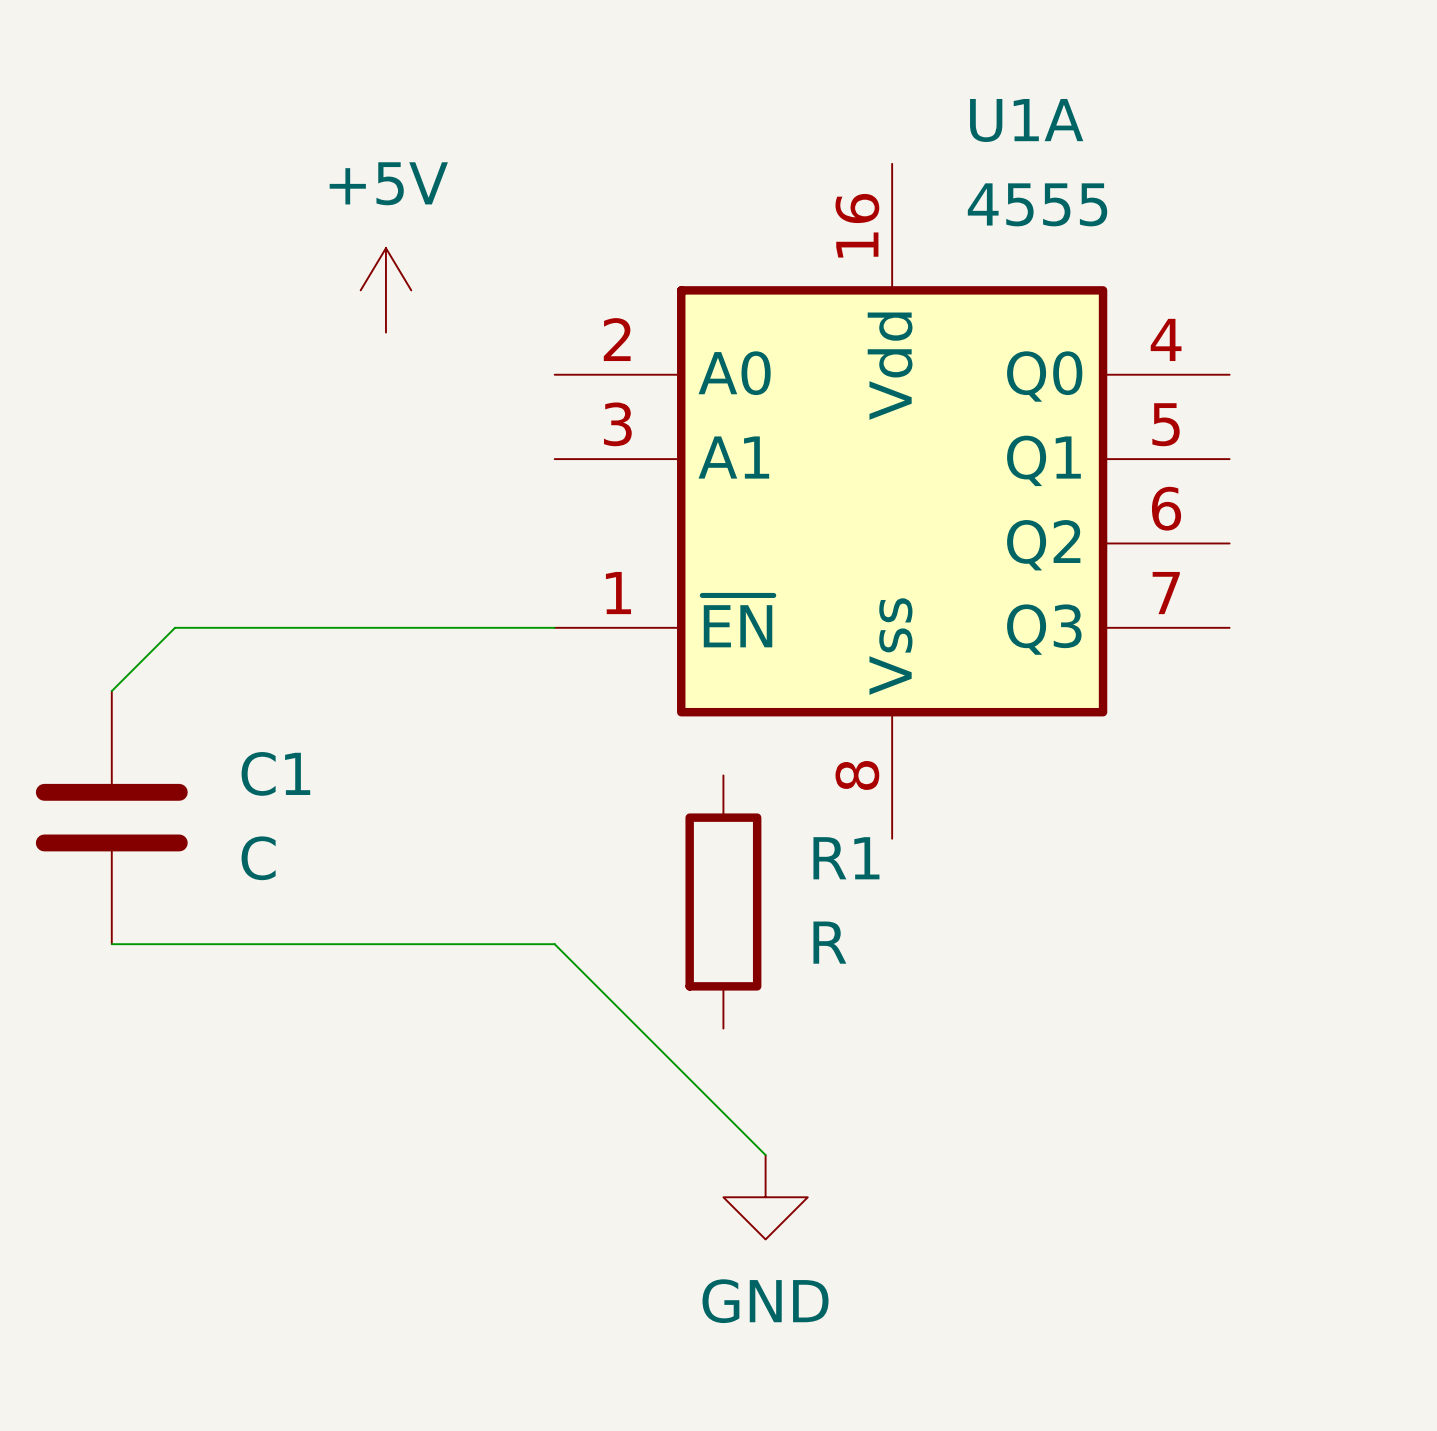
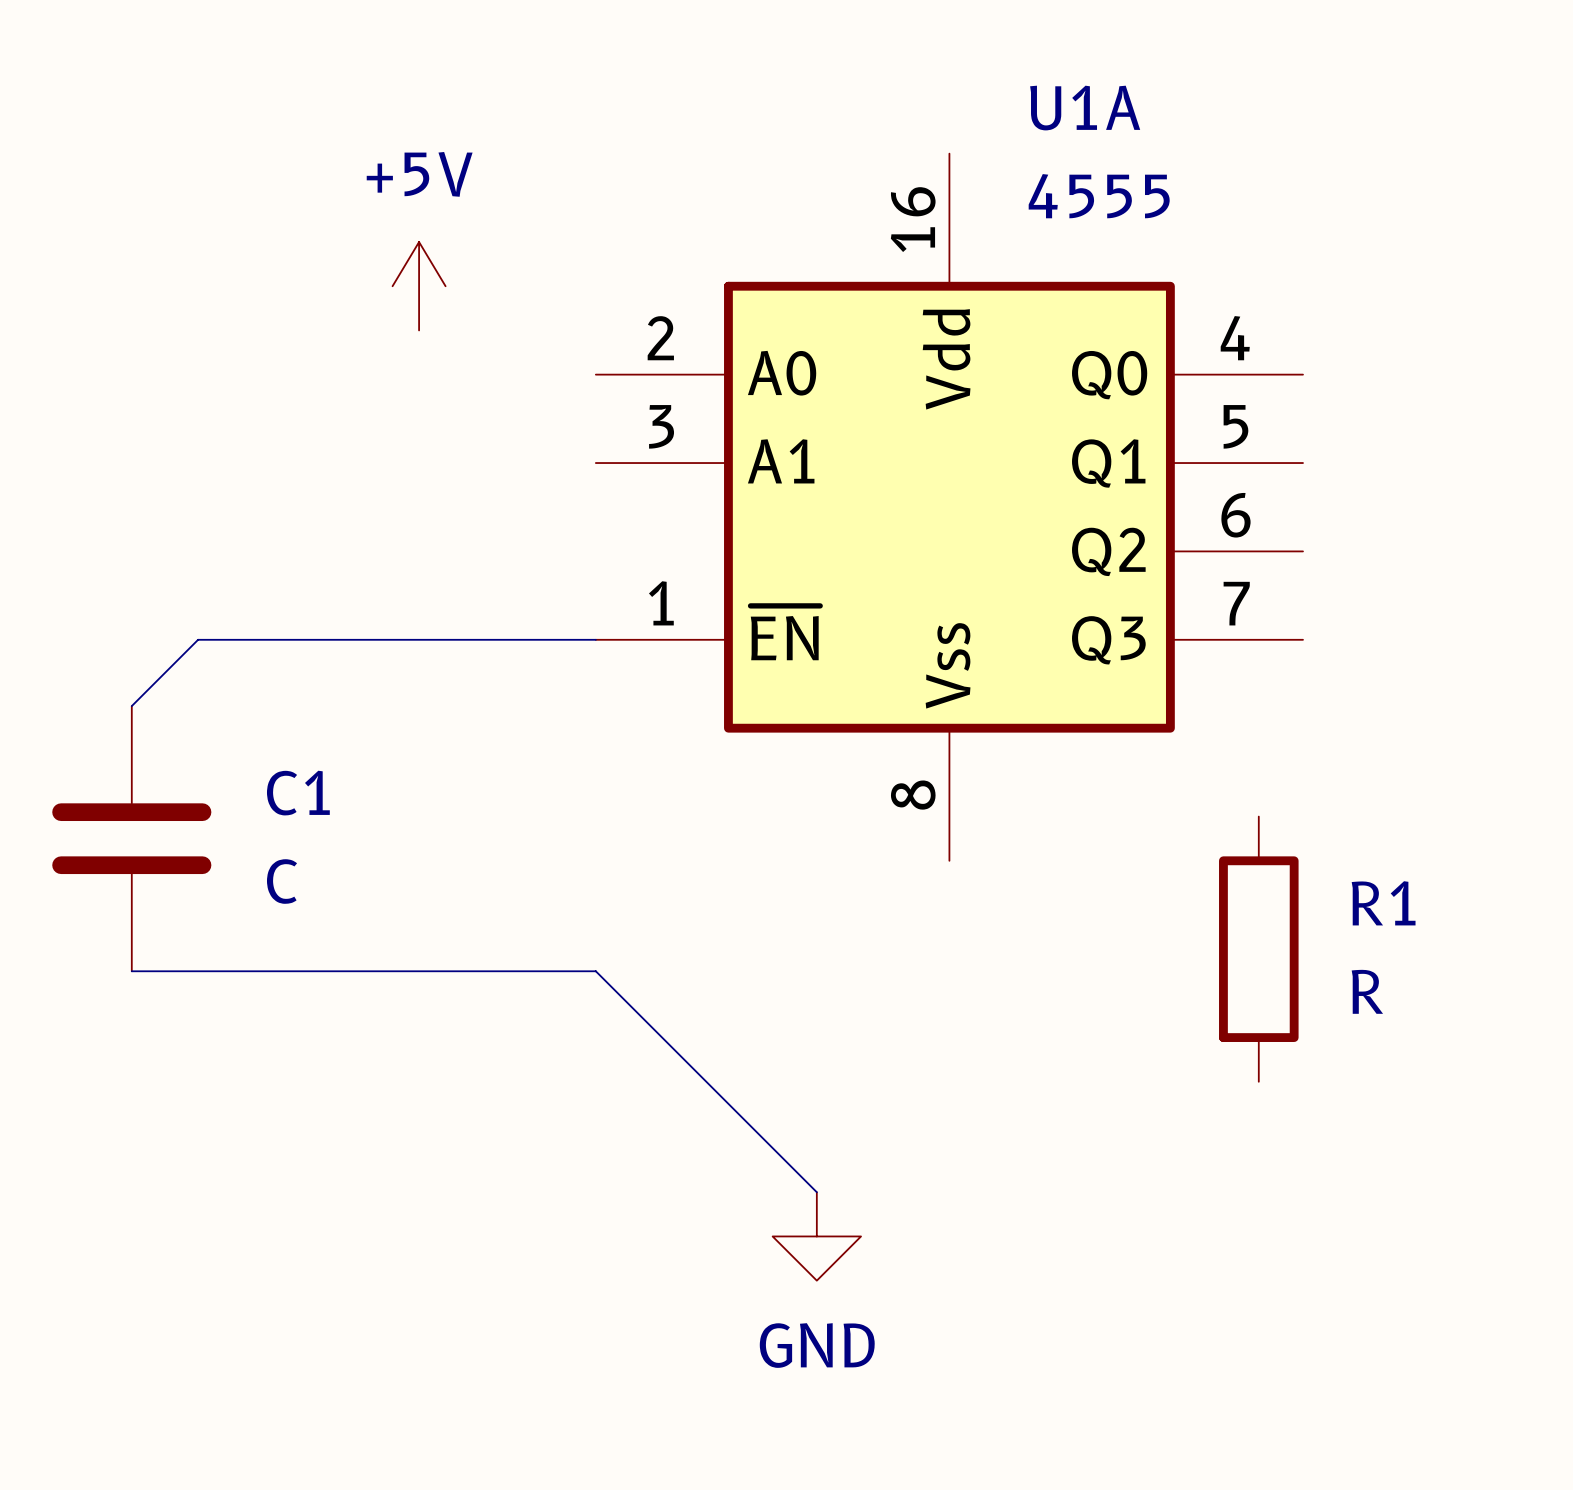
R1 position: (723, 902) -> (1258, 949)

